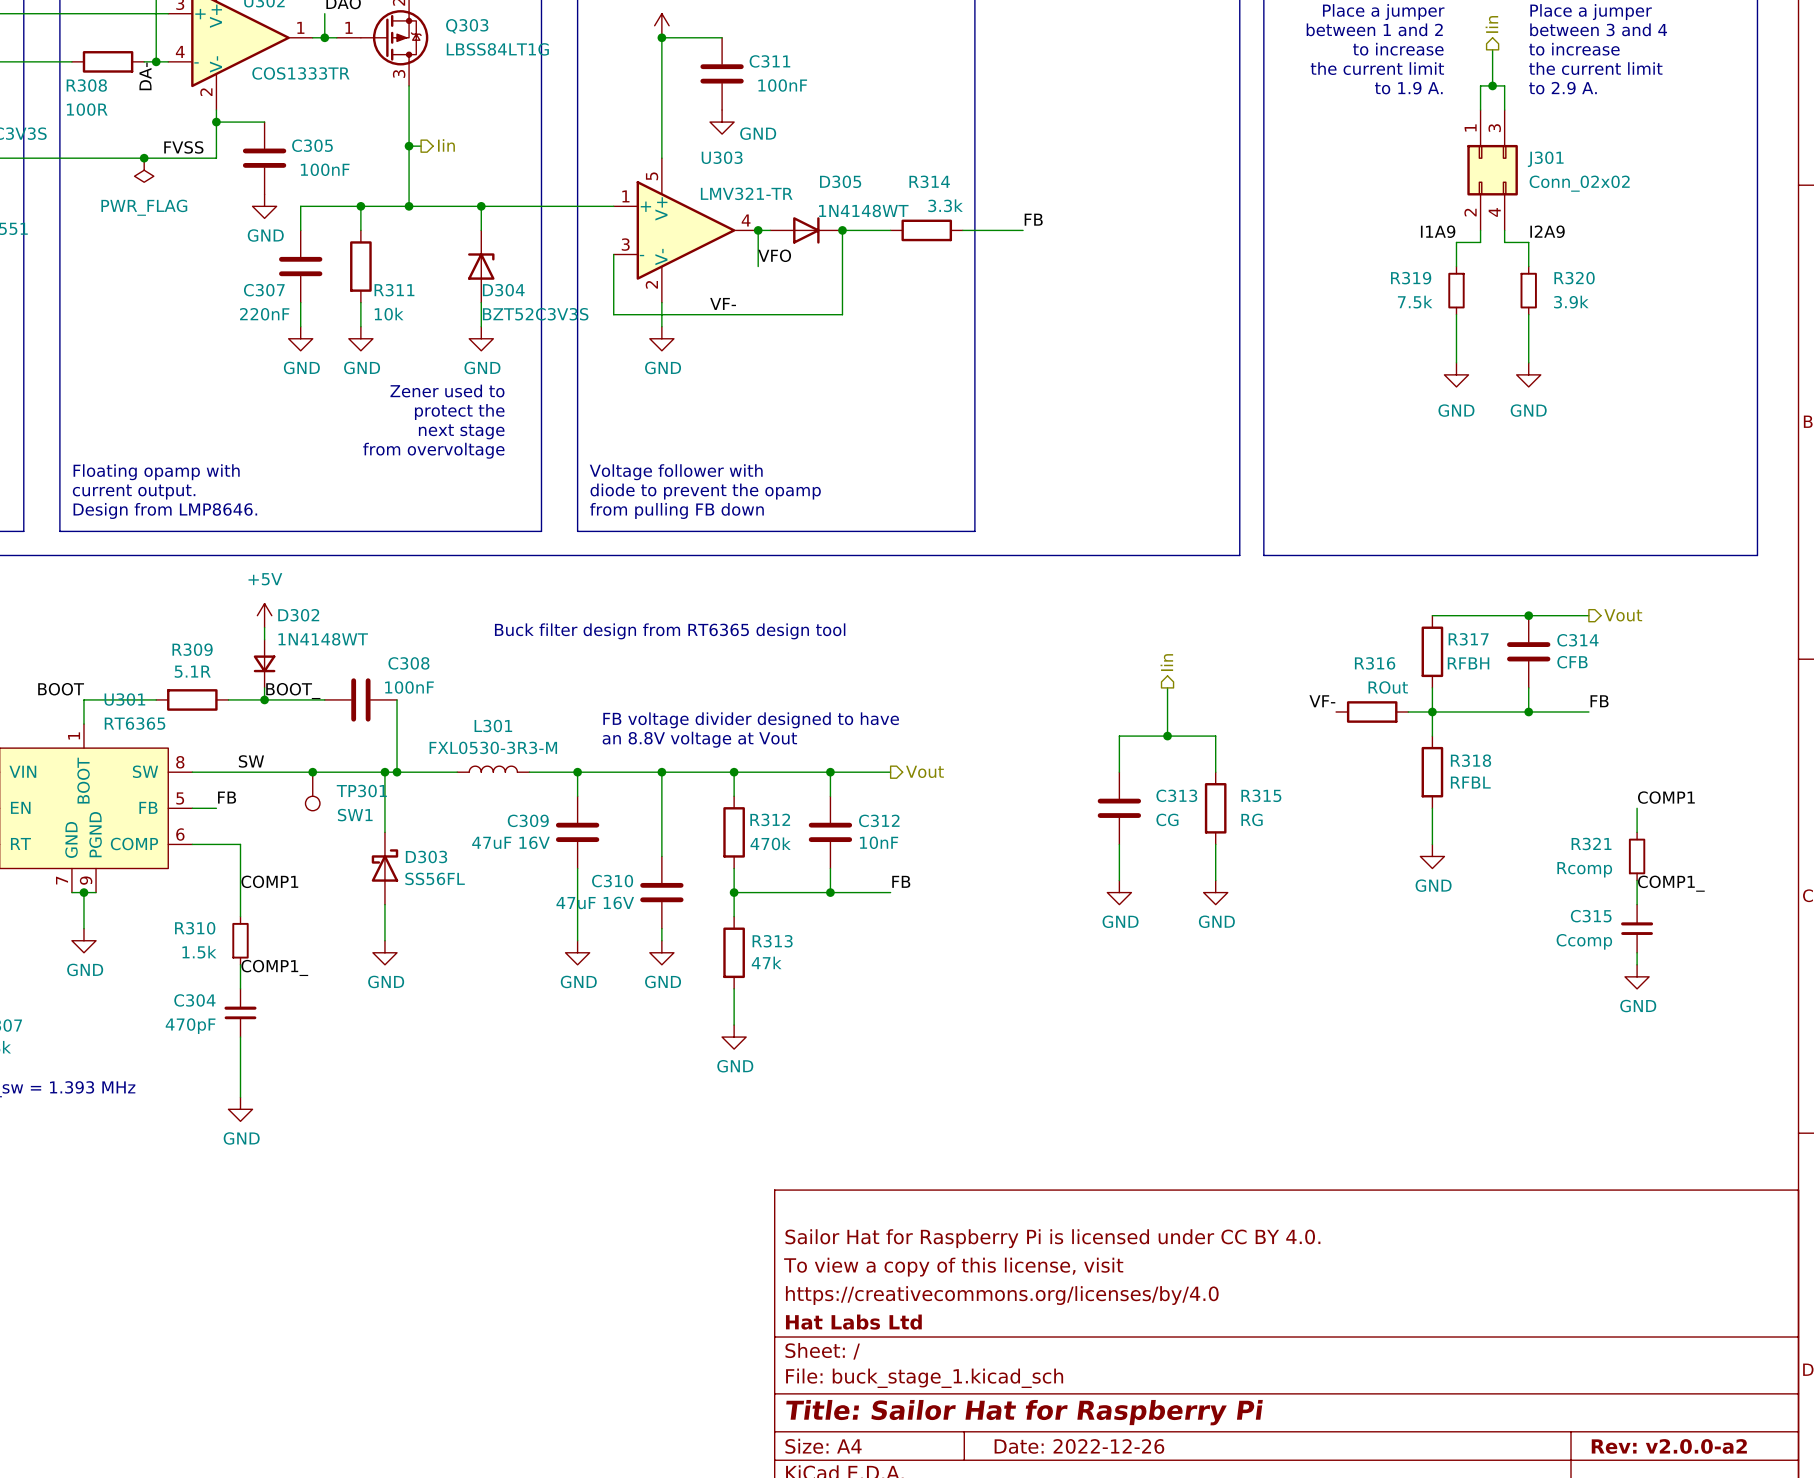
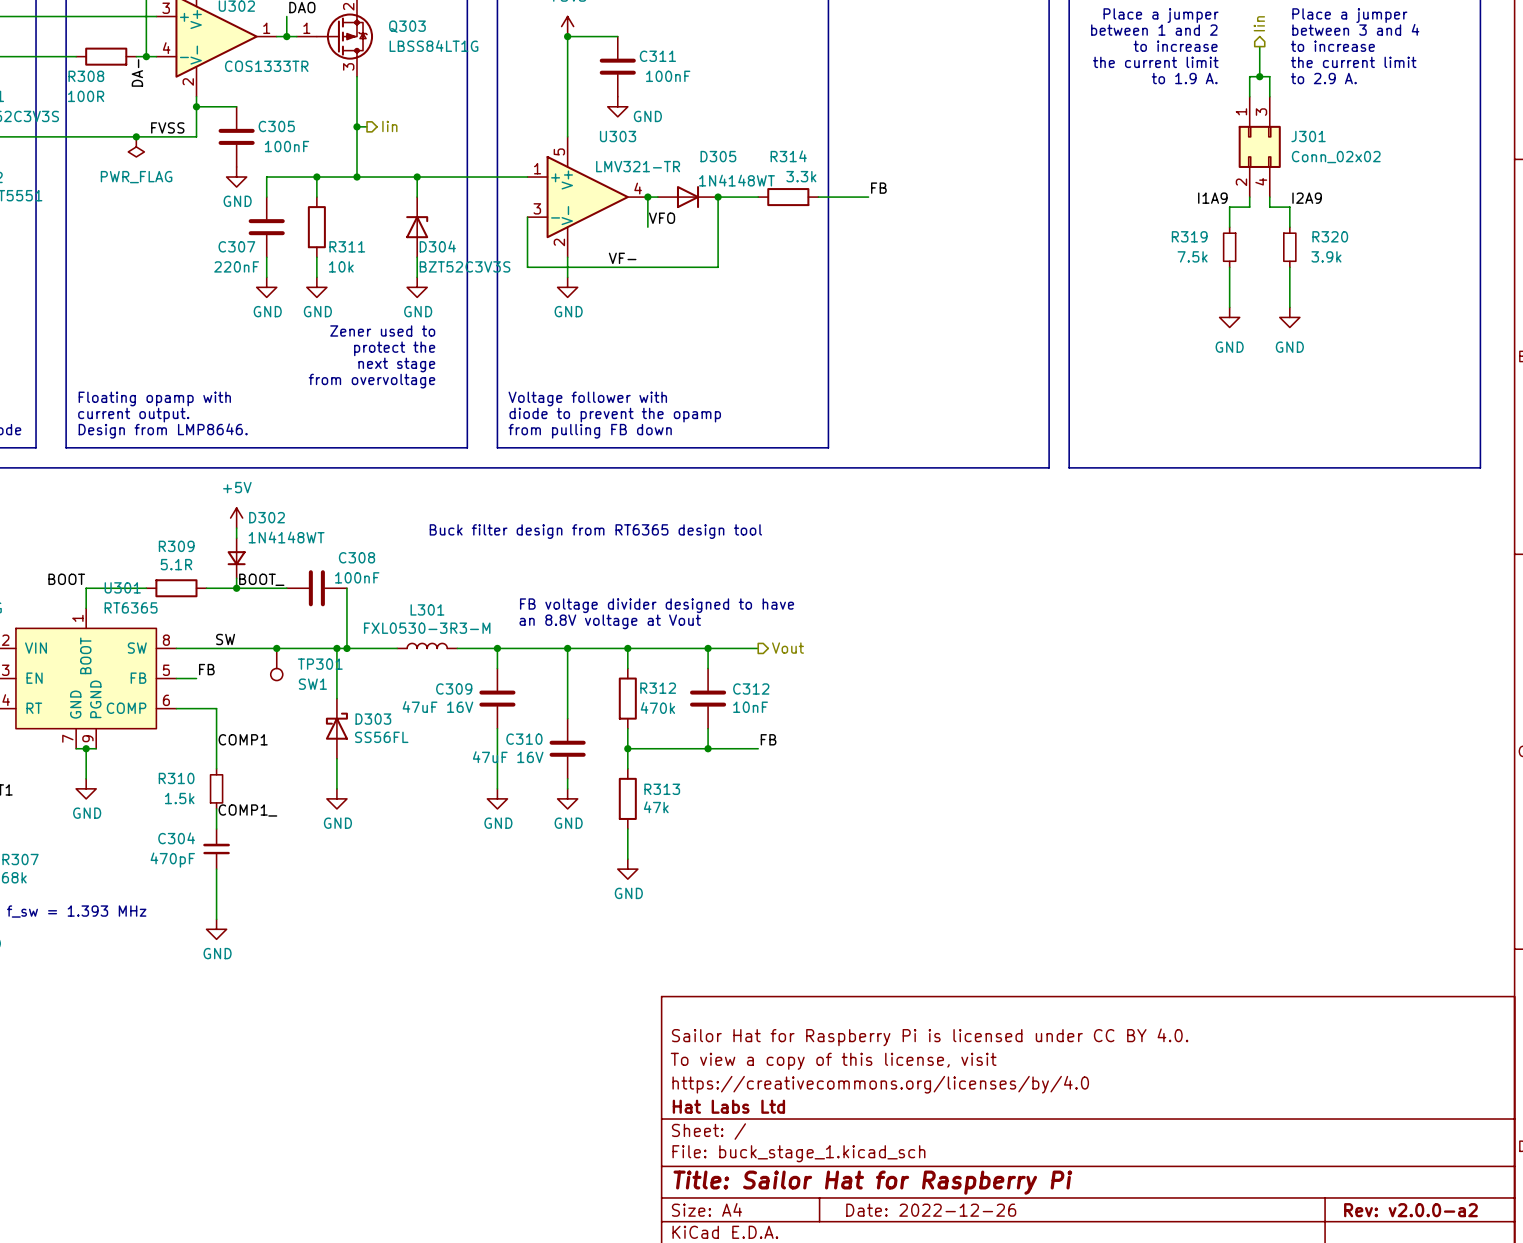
wire: (1432, 615) (1588, 615) -> none
junction: (1528, 615) -> none
hierarchical label: Vout (1623, 615) -> none
R317: RFBH (1432, 651) -> none
C314: CFB (1528, 651) -> none
hierarchical label: Iin (1166, 662) -> none
wire: (1167, 687) (1167, 736) -> none
wire: (1432, 687) (1432, 736) -> none
wire: (1528, 687) (1528, 711) -> none
label: VF- (1322, 701) -> none
label: FB (1599, 701) -> none
R316: ROut (1372, 711) -> none
wire: (1408, 711) (1588, 711) -> none
junction: (1432, 711) -> none
junction: (1528, 711) -> none
junction: (1167, 736) -> none
wire: (1119, 772) (1119, 736) (1215, 736) (1215, 772) -> none
R318: RFBL (1432, 772) -> none
label: COMP1 (1666, 797) -> none
C313: CG (1119, 808) -> none
R315: RG (1215, 808) -> none
wire: (1432, 808) (1432, 844) -> none
wire: (1637, 808) (1637, 832) -> none
wire: (1119, 844) (1119, 880) -> none
wire: (1215, 844) (1215, 880) -> none
power symbol: GND (1432, 856) -> none
R321: Rcomp (1637, 856) -> none
wire: (1637, 880) (1637, 904) -> none
label: COMP1_ (1671, 883) -> none
power symbol: GND (1119, 892) -> none
power symbol: GND (1215, 892) -> none
C315: Ccomp (1637, 928) -> none
wire: (1637, 952) (1637, 964) -> none
power symbol: GND (1637, 976) -> none

